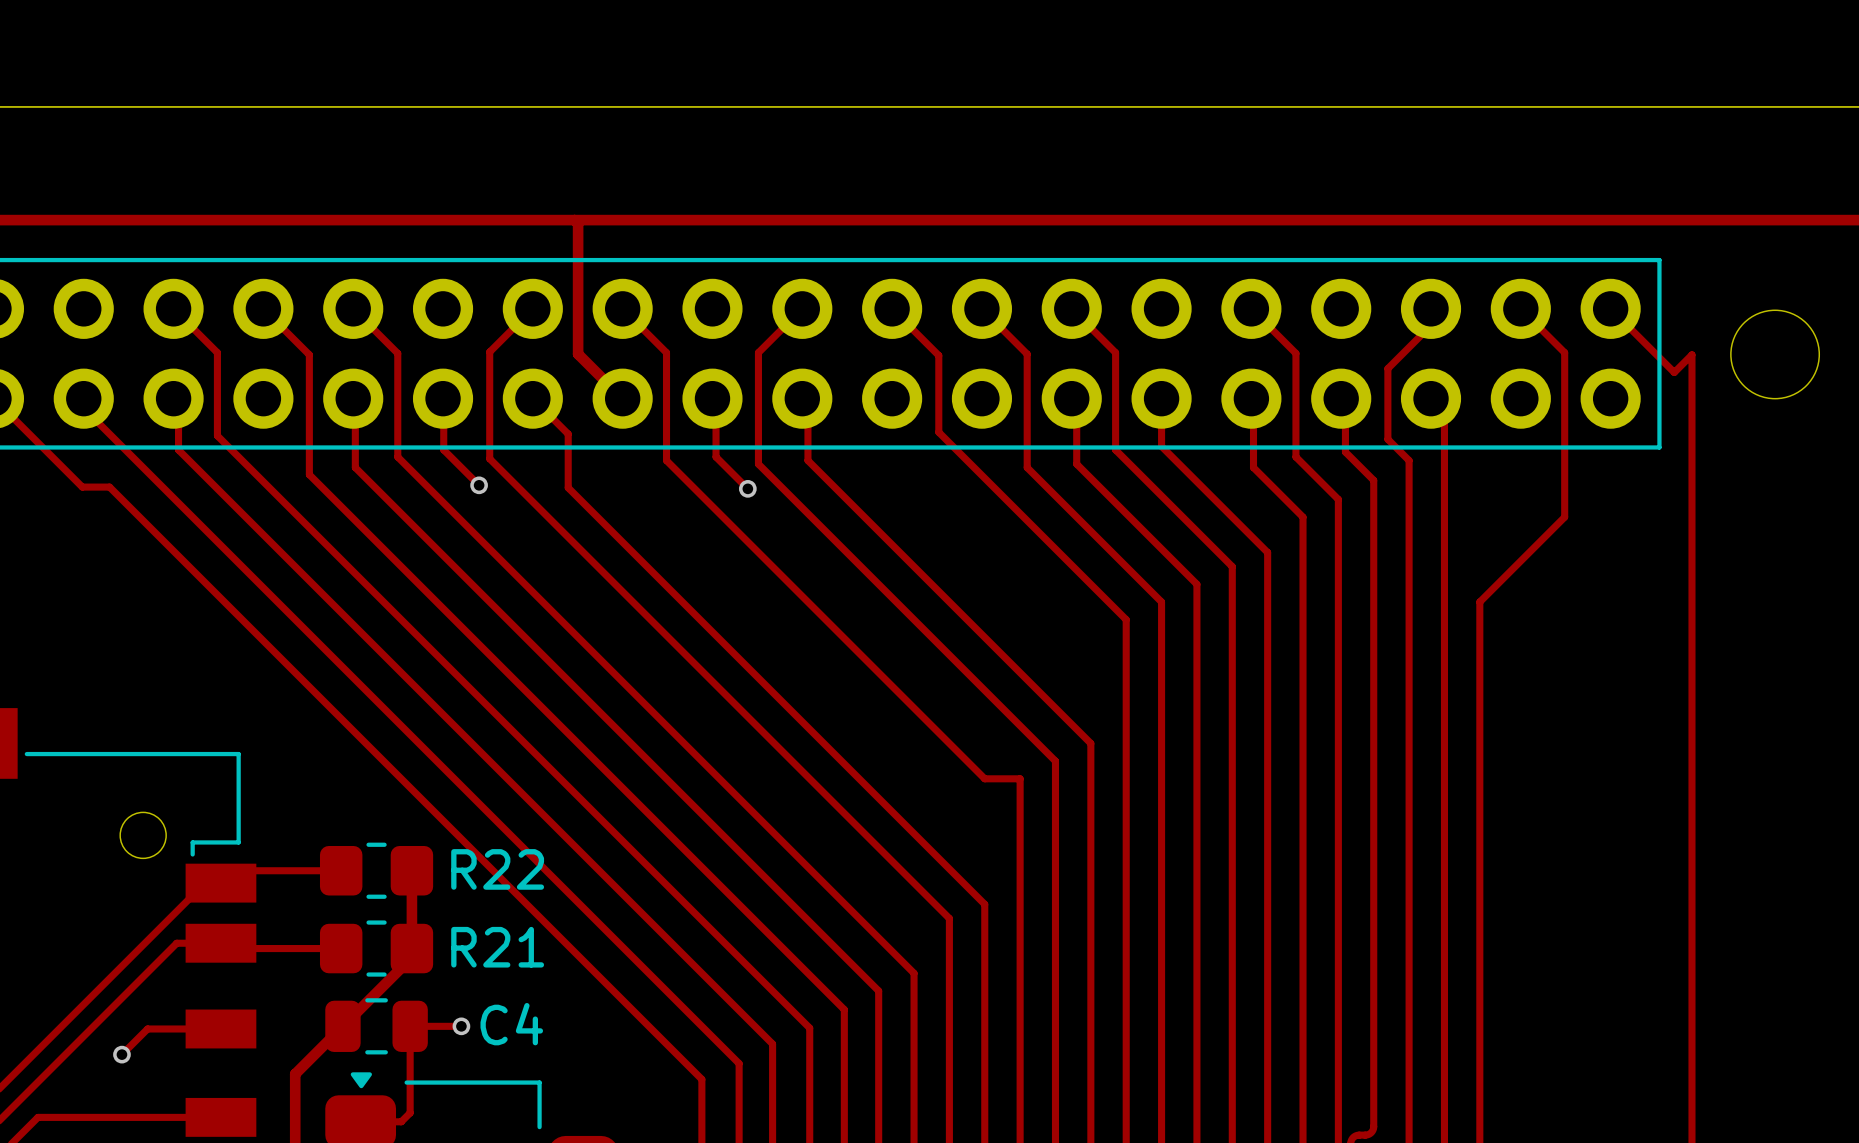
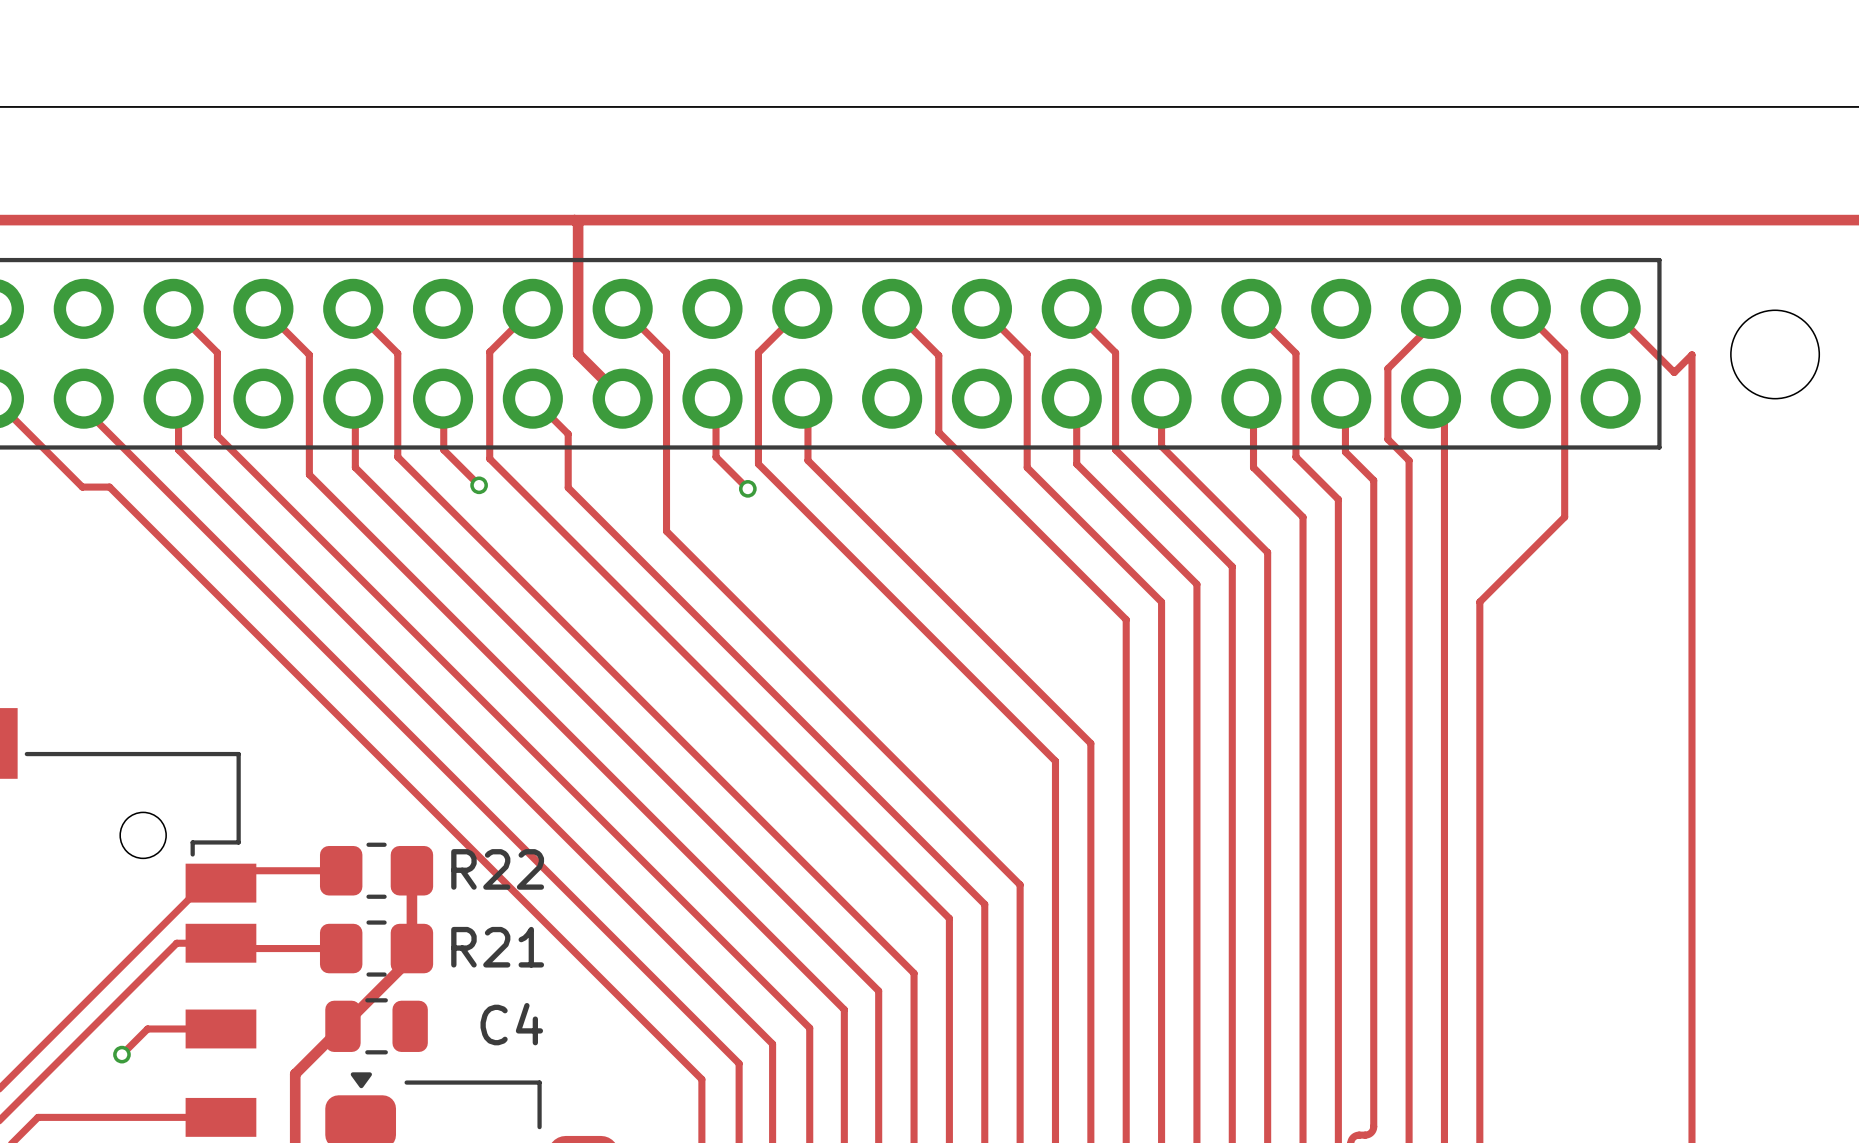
track: (666, 460) (984, 778) (1020, 778) (1020, 884) -> (666, 460) (666, 531) (1020, 884)
track: (461, 1026) (410, 1026) (410, 1112) (401, 1121) (360, 1121) -> none
via: (461, 1026) -> none

